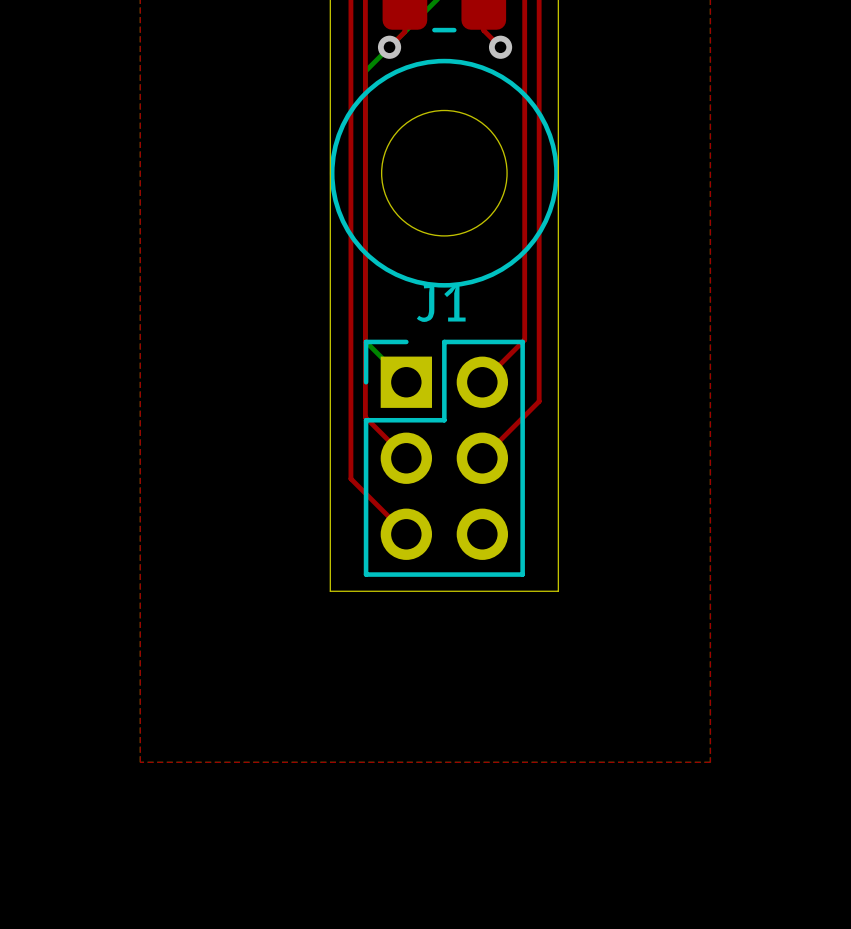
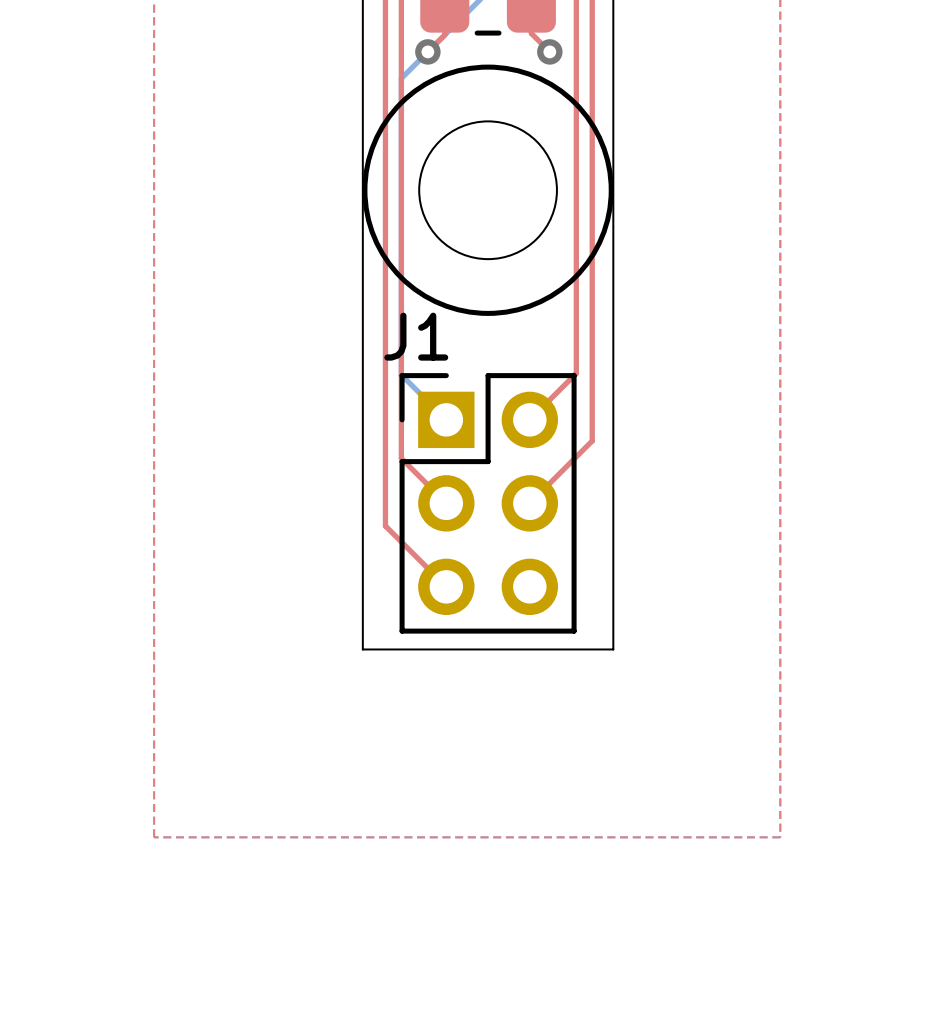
J1 name position: J1 (441, 302) -> J1 (416, 336)

